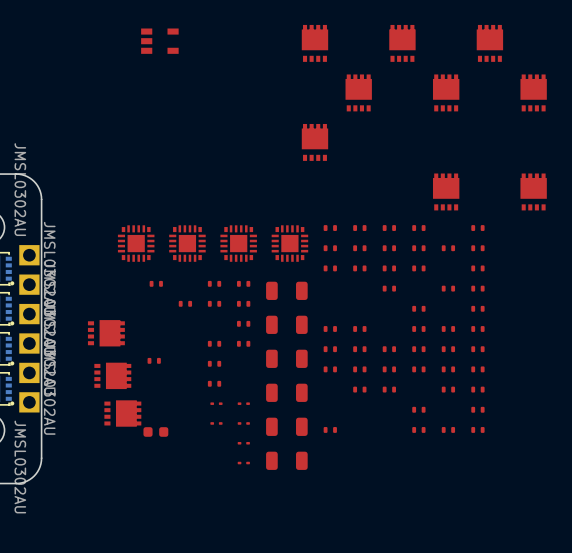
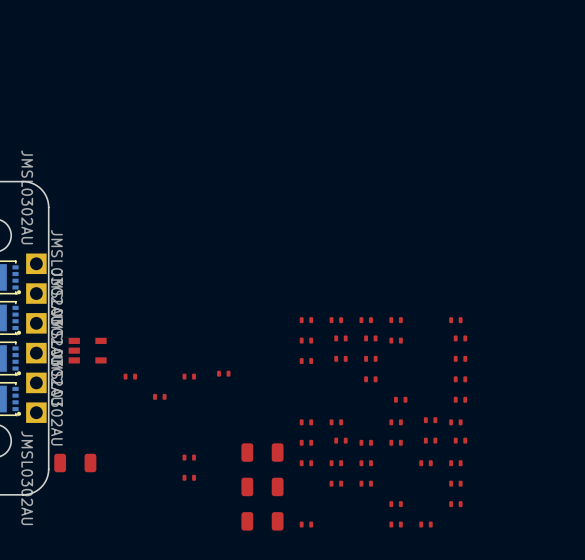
part: (159, 41) -> none
part: (314, 43) -> none
part: (402, 43) -> none
part: (489, 43) -> none
part: (358, 92) -> none
part: (446, 92) -> none
part: (533, 92) -> none
part: (314, 142) -> none
part: (446, 191) -> none
part: (533, 191) -> none
part: (330, 228) -> none
part: (359, 228) -> none
part: (389, 228) -> none
part: (418, 228) -> none
part: (477, 228) -> none
part: (136, 243) -> none
part: (187, 243) -> none
part: (238, 243) -> none
part: (289, 243) -> none
part: (330, 248) -> none
part: (359, 248) -> none
part: (389, 248) -> none
part: (418, 248) -> none
part: (448, 248) -> none
part: (477, 248) -> none
part: (330, 268) -> none
part: (359, 268) -> none
part: (389, 268) -> none
part: (418, 268) -> none
part: (477, 268) -> none
part: (156, 283) -> none
part: (214, 283) -> none
part: (243, 283) -> none
part: (389, 288) -> none
part: (448, 288) -> none
part: (477, 288) -> none
part: (286, 290) -> none
part: (185, 303) -> none
part: (214, 303) -> none
part: (243, 303) -> none
part: (418, 308) -> none
part: (477, 308) -> none
part: none -> (306, 320)
part: none -> (336, 320)
part: none -> (366, 320)
part: none -> (396, 320)
part: none -> (455, 320)
part: (243, 323) -> none
part: (286, 324) -> none
part: (418, 328) -> none
part: (477, 328) -> none
part: none -> (306, 340)
part: none -> (396, 340)
part: (106, 333) -> none
part: none -> (87, 350)
part: (214, 343) -> none
part: (243, 343) -> none
part: (389, 349) -> none
part: (418, 349) -> none
part: (477, 349) -> none
part: none -> (306, 361)
part: (286, 358) -> none
part: (154, 360) -> none
part: none -> (130, 376)
part: none -> (189, 376)
part: (330, 369) -> none
part: (389, 369) -> none
part: (418, 369) -> none
part: (477, 369) -> none
part: (112, 375) -> none
part: (214, 383) -> none
part: none -> (159, 396)
part: (359, 389) -> none
part: (477, 389) -> none
part: (286, 392) -> none
part: (216, 403) -> none
part: (243, 403) -> none
part: (477, 409) -> none
part: none -> (306, 422)
part: none -> (336, 422)
part: none -> (396, 422)
part: none -> (455, 422)
part: (122, 413) -> none
part: (216, 423) -> none
part: (243, 423) -> none
part: (286, 426) -> none
part: (477, 429) -> none
part: (155, 431) -> none
part: none -> (306, 442)
part: none -> (366, 442)
part: none -> (396, 442)
part footprint: [237, 441, 250, 445] -> [241, 443, 284, 462]
part: none -> (189, 457)
part: none -> (75, 463)
part: none -> (306, 463)
part: none -> (336, 463)
part: none -> (366, 463)
part: none -> (425, 463)
part: none -> (455, 463)
part: (286, 460) -> none
part: (243, 463) -> none
part: none -> (189, 477)
part: none -> (336, 483)
part: none -> (366, 483)
part: none -> (455, 483)
part: none -> (262, 486)
part: none -> (396, 504)
part: none -> (455, 504)
part: none -> (262, 521)
part: none -> (306, 524)
part: none -> (396, 524)
part: none -> (425, 524)

